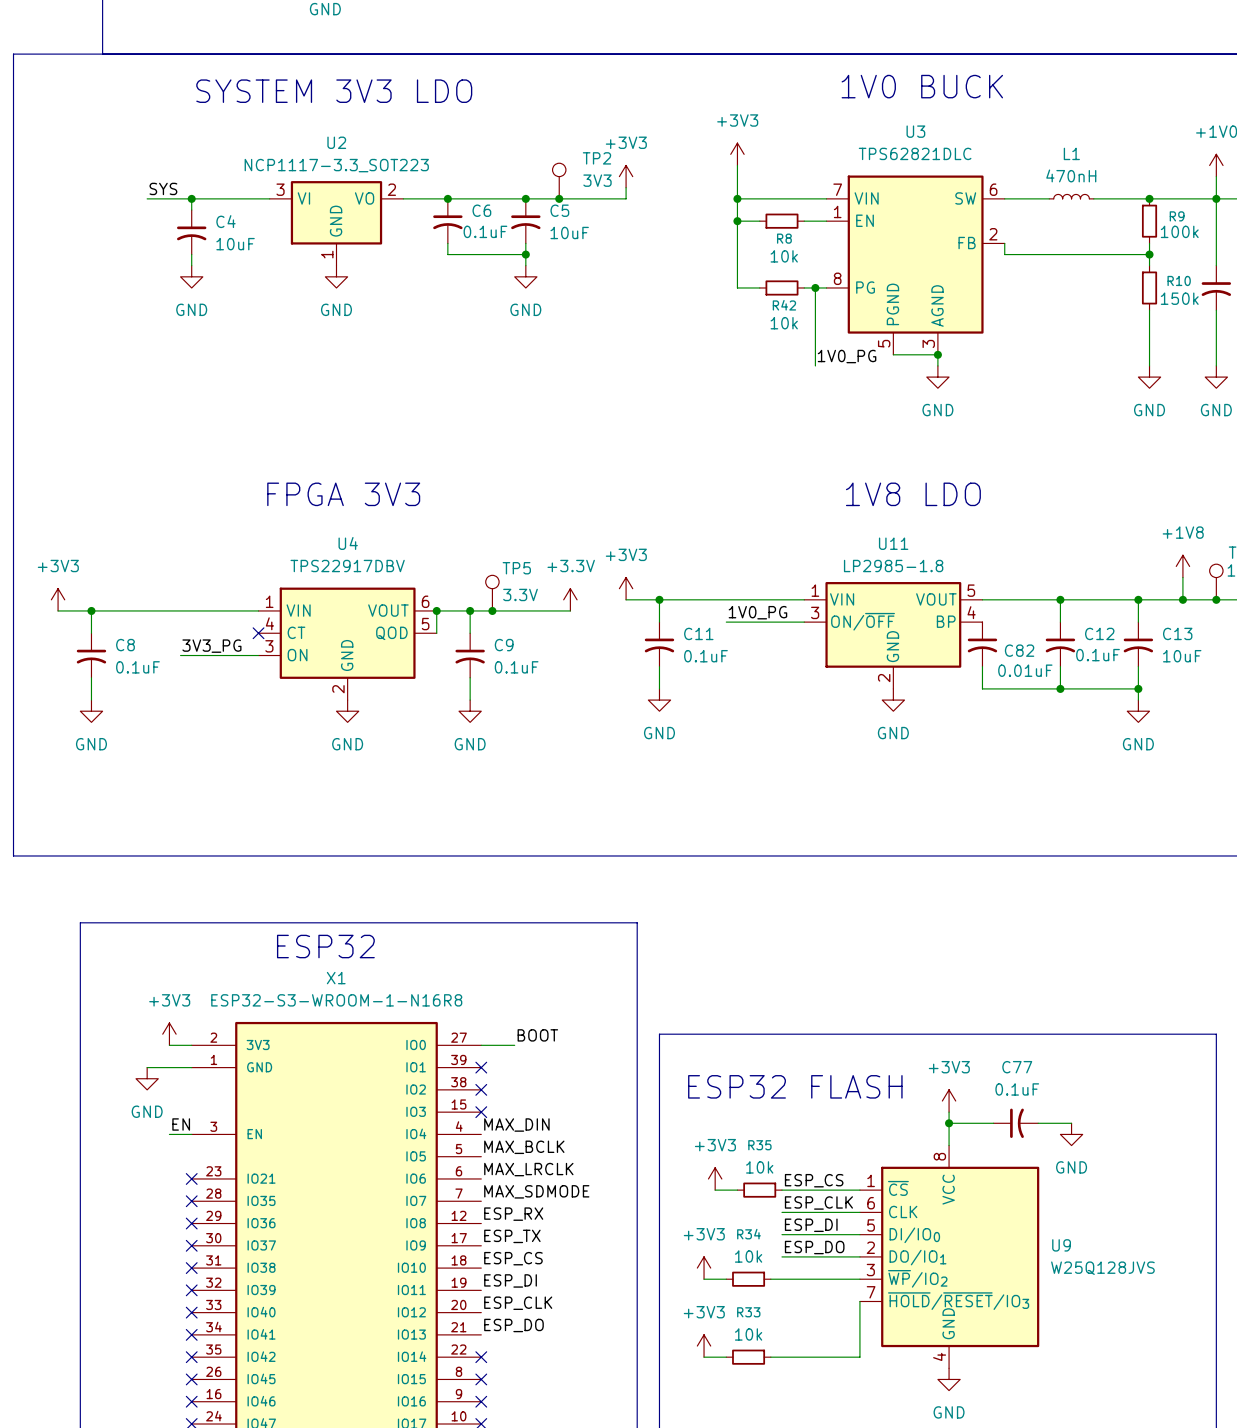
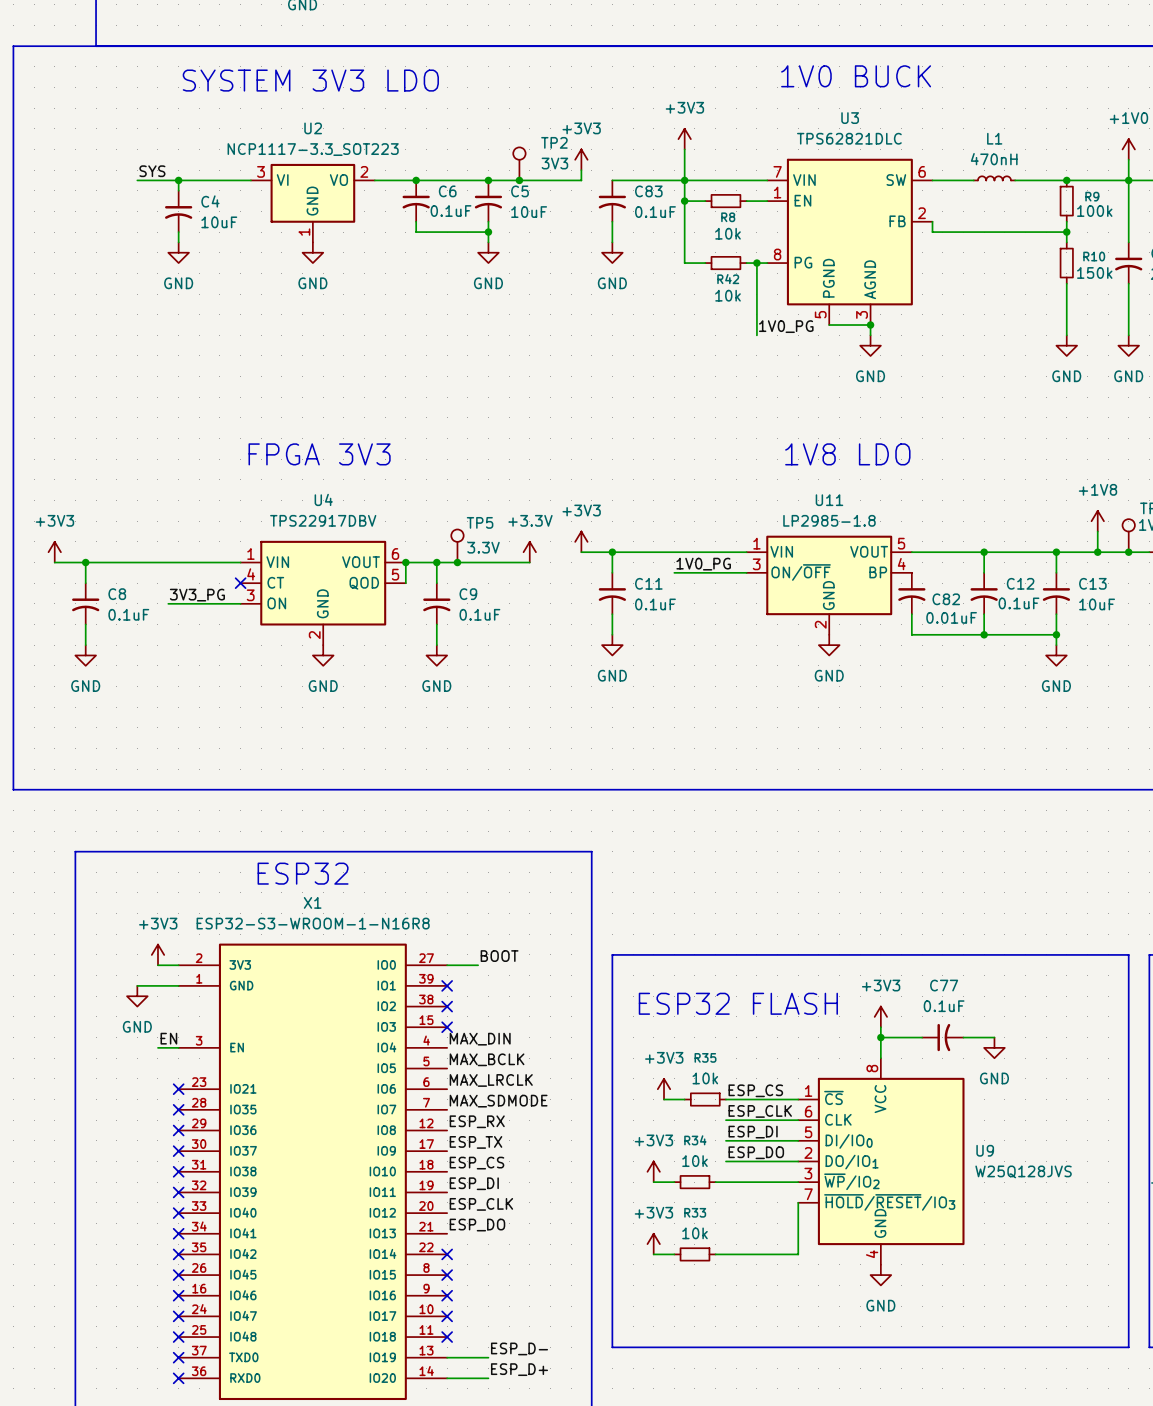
wire: none -> (612, 180) (684, 180)
C83: none -> 0.1uF (612, 201)
wire: none -> (612, 221) (612, 242)
power symbol: none -> GND (612, 252)

